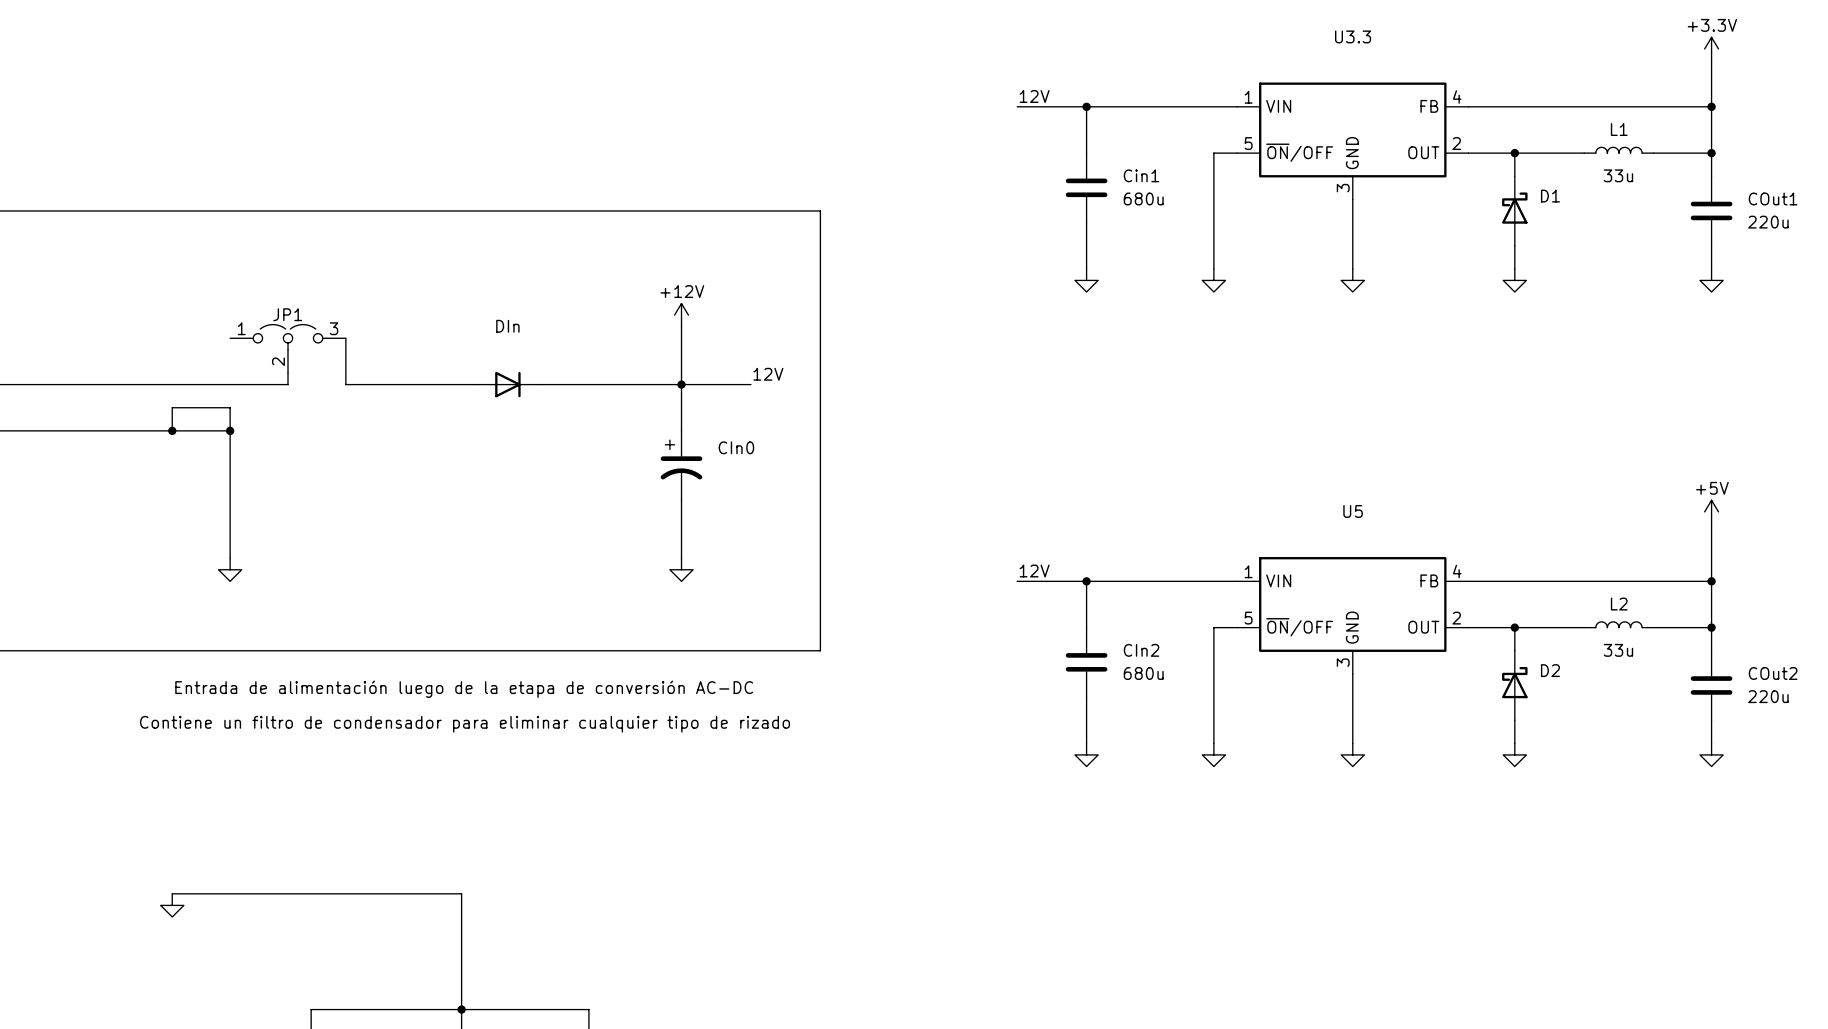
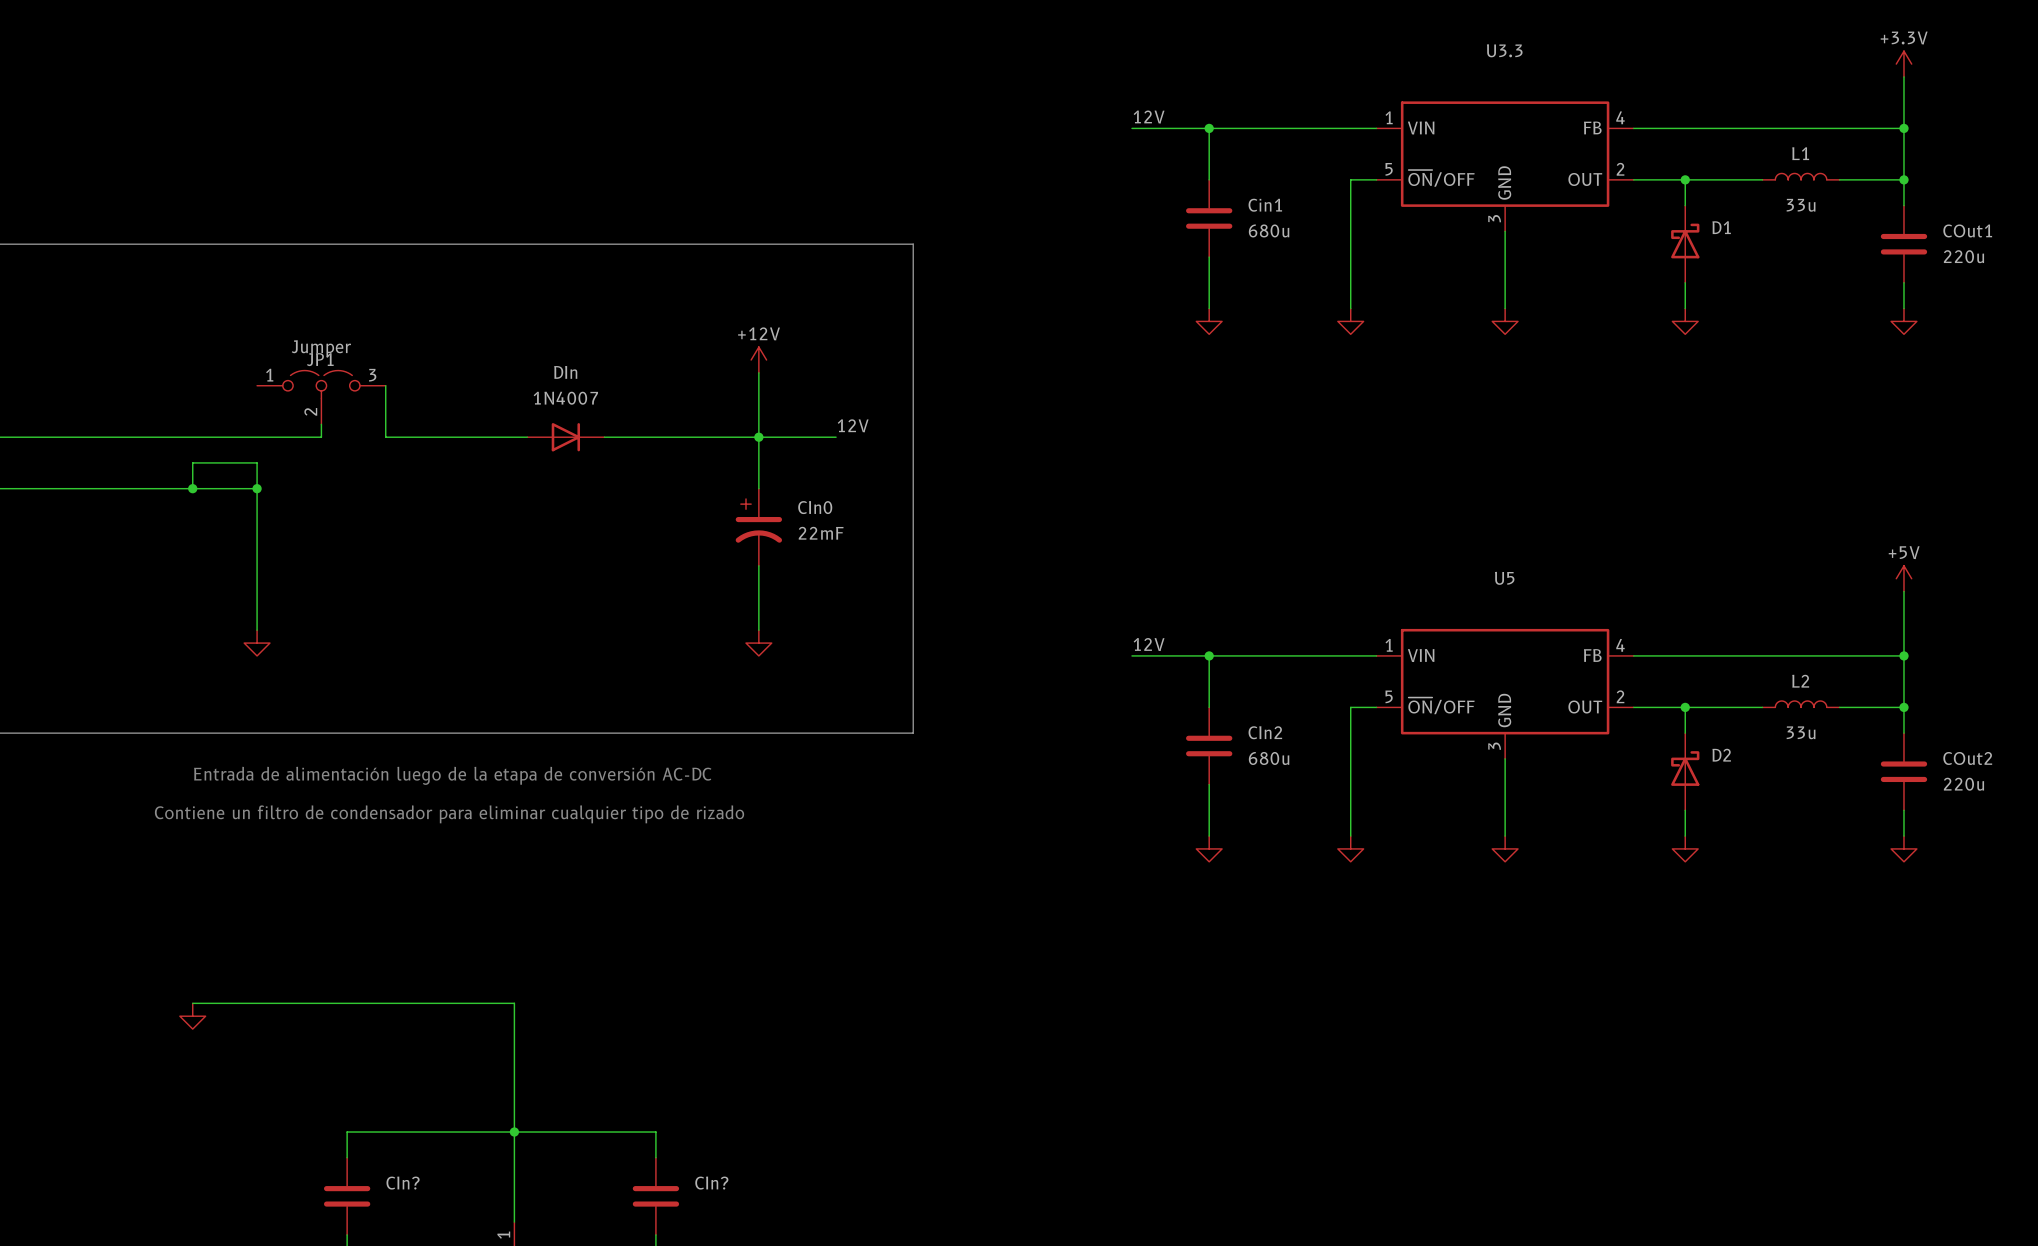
JP1 value: none -> Jumper (321, 348)
DIn value: none -> 1N4007 (565, 398)
CIn0 value: none -> 22mF (821, 533)

